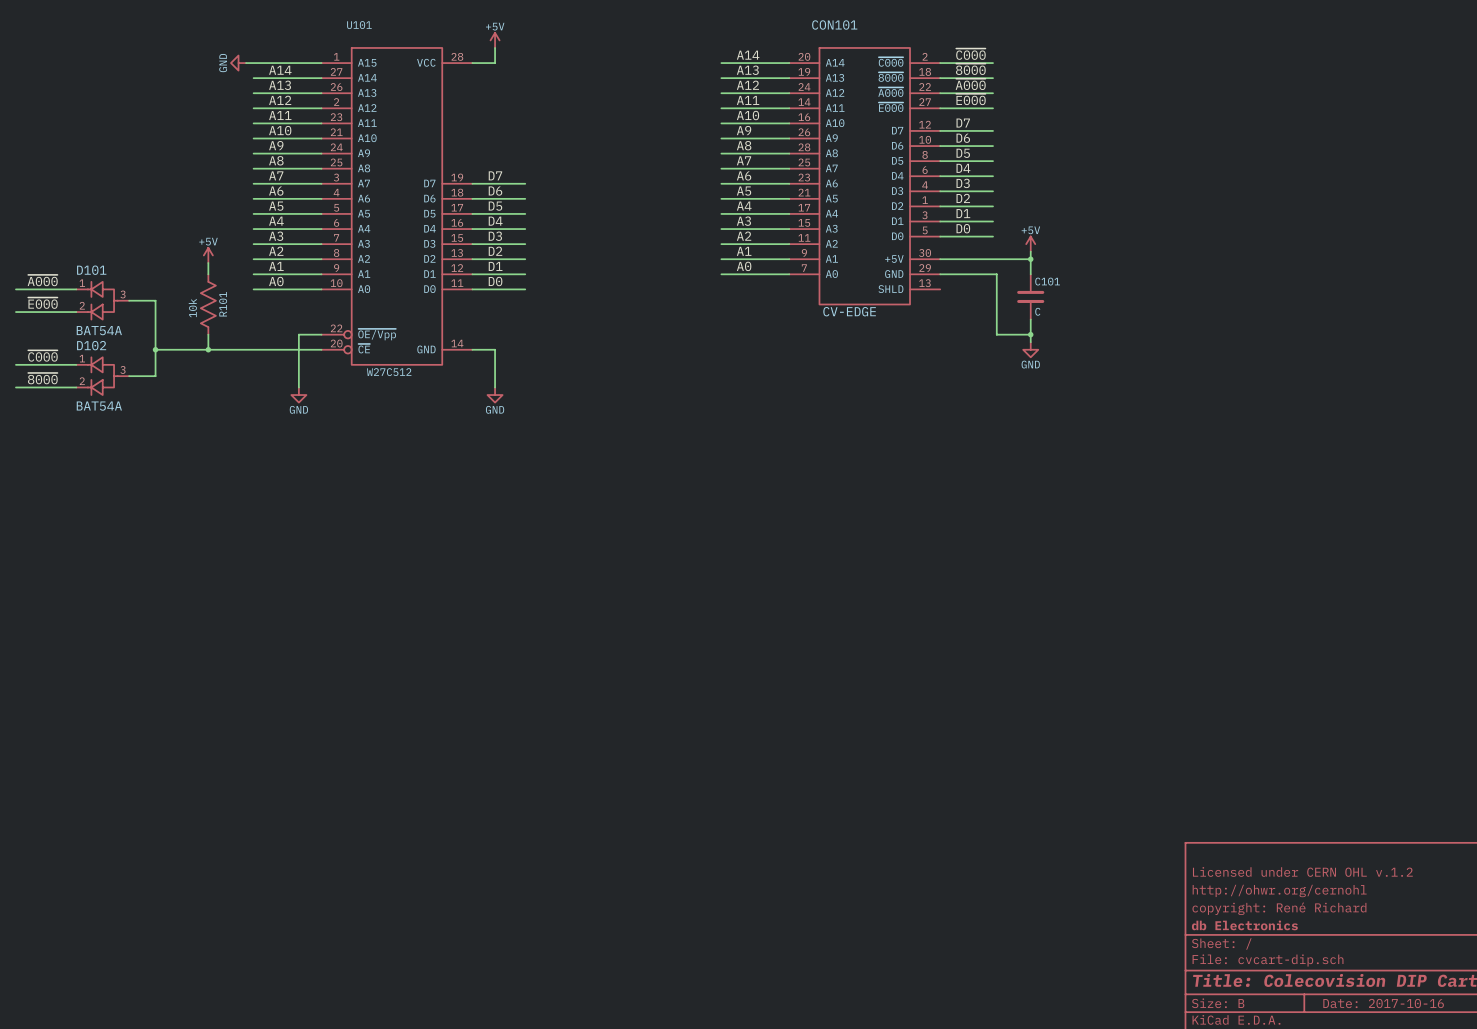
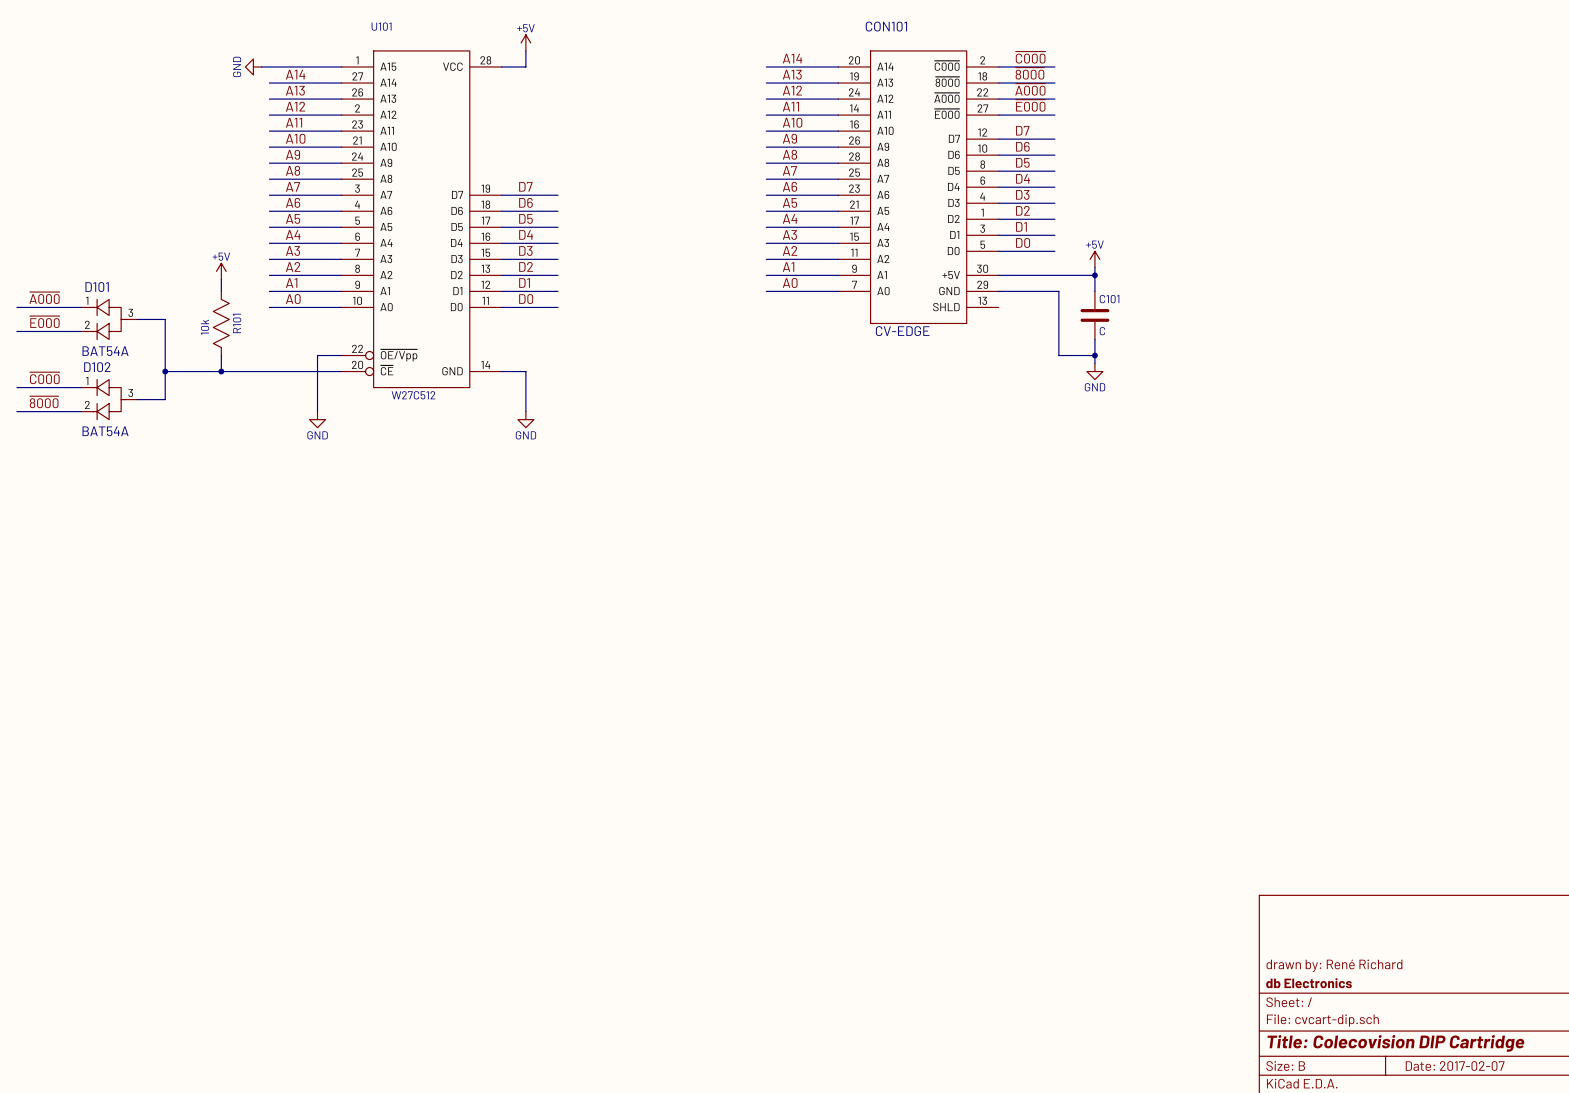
title block: Licensed under CERN OHL v.1.2 (1302, 871) -> none
title block: http://ohwr.org/cernohl (1279, 890) -> none
title block: copyright: René Richard (1279, 908) -> drawn by: René Richard (1334, 965)
title block: Date: 2017-10-16 (1383, 1003) -> Date: 2017-02-07 (1455, 1066)

